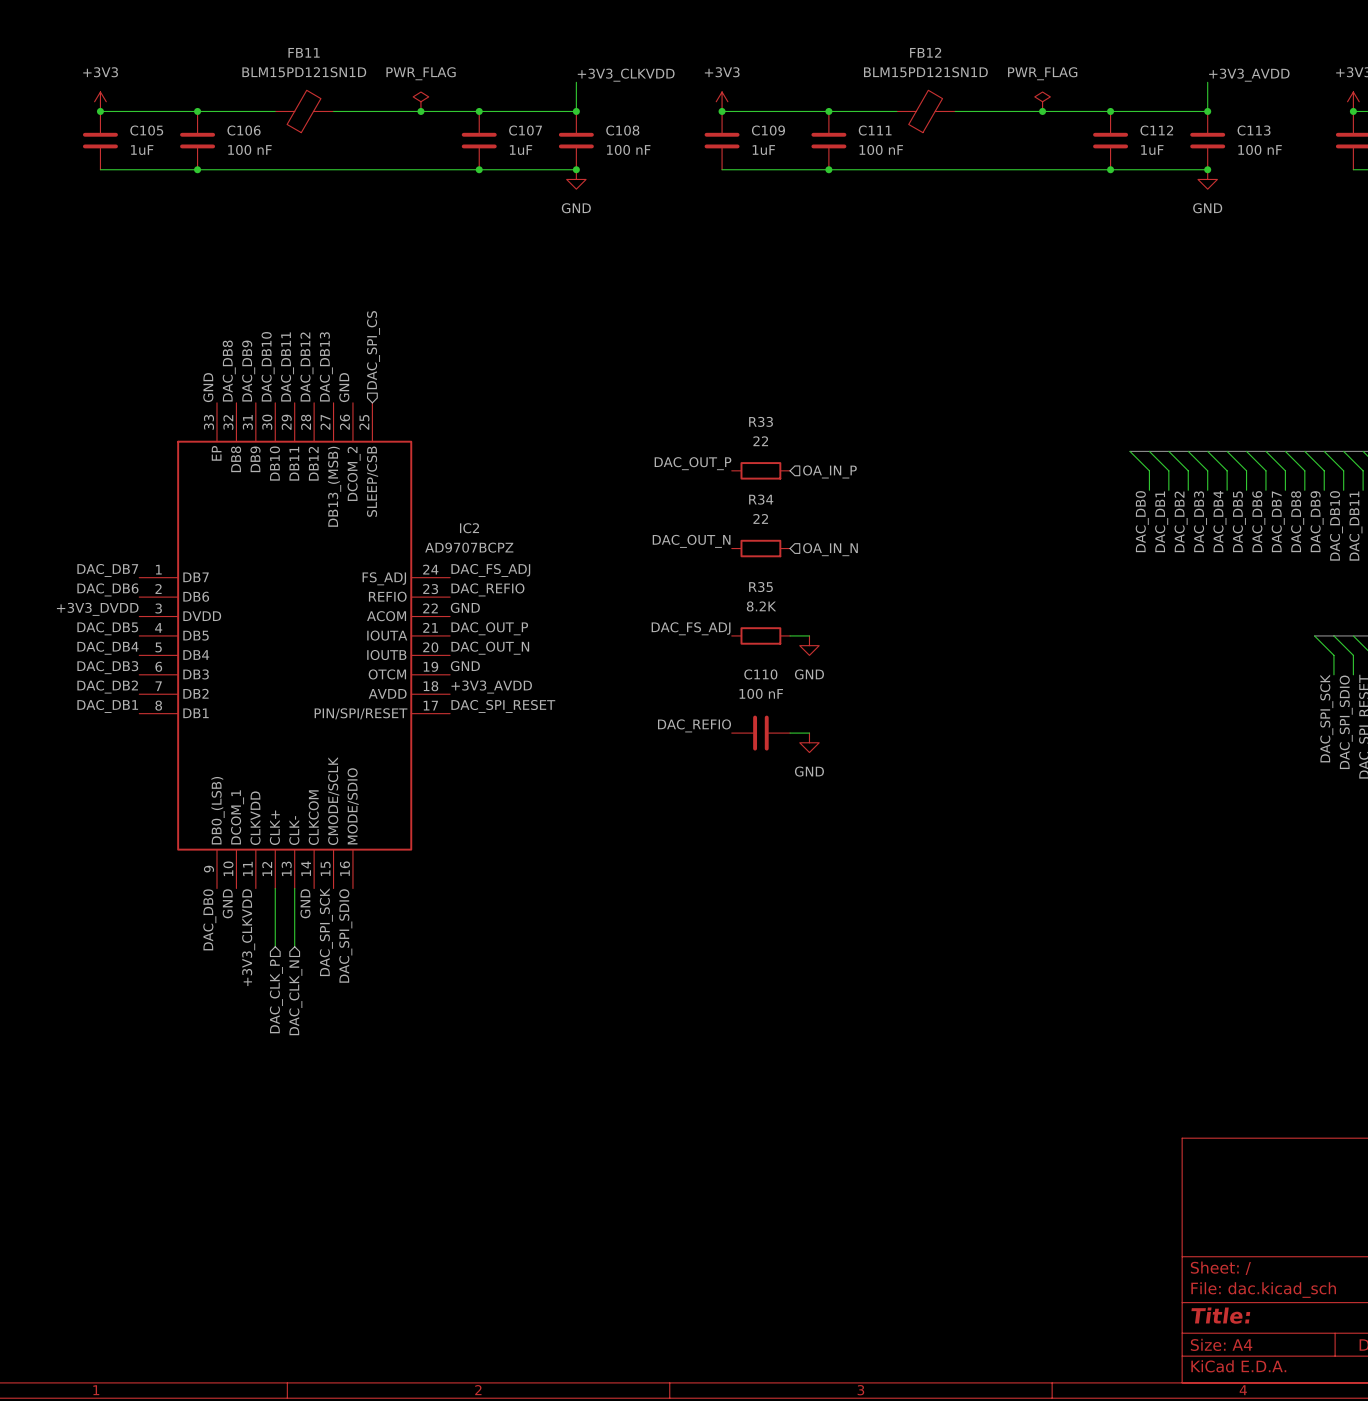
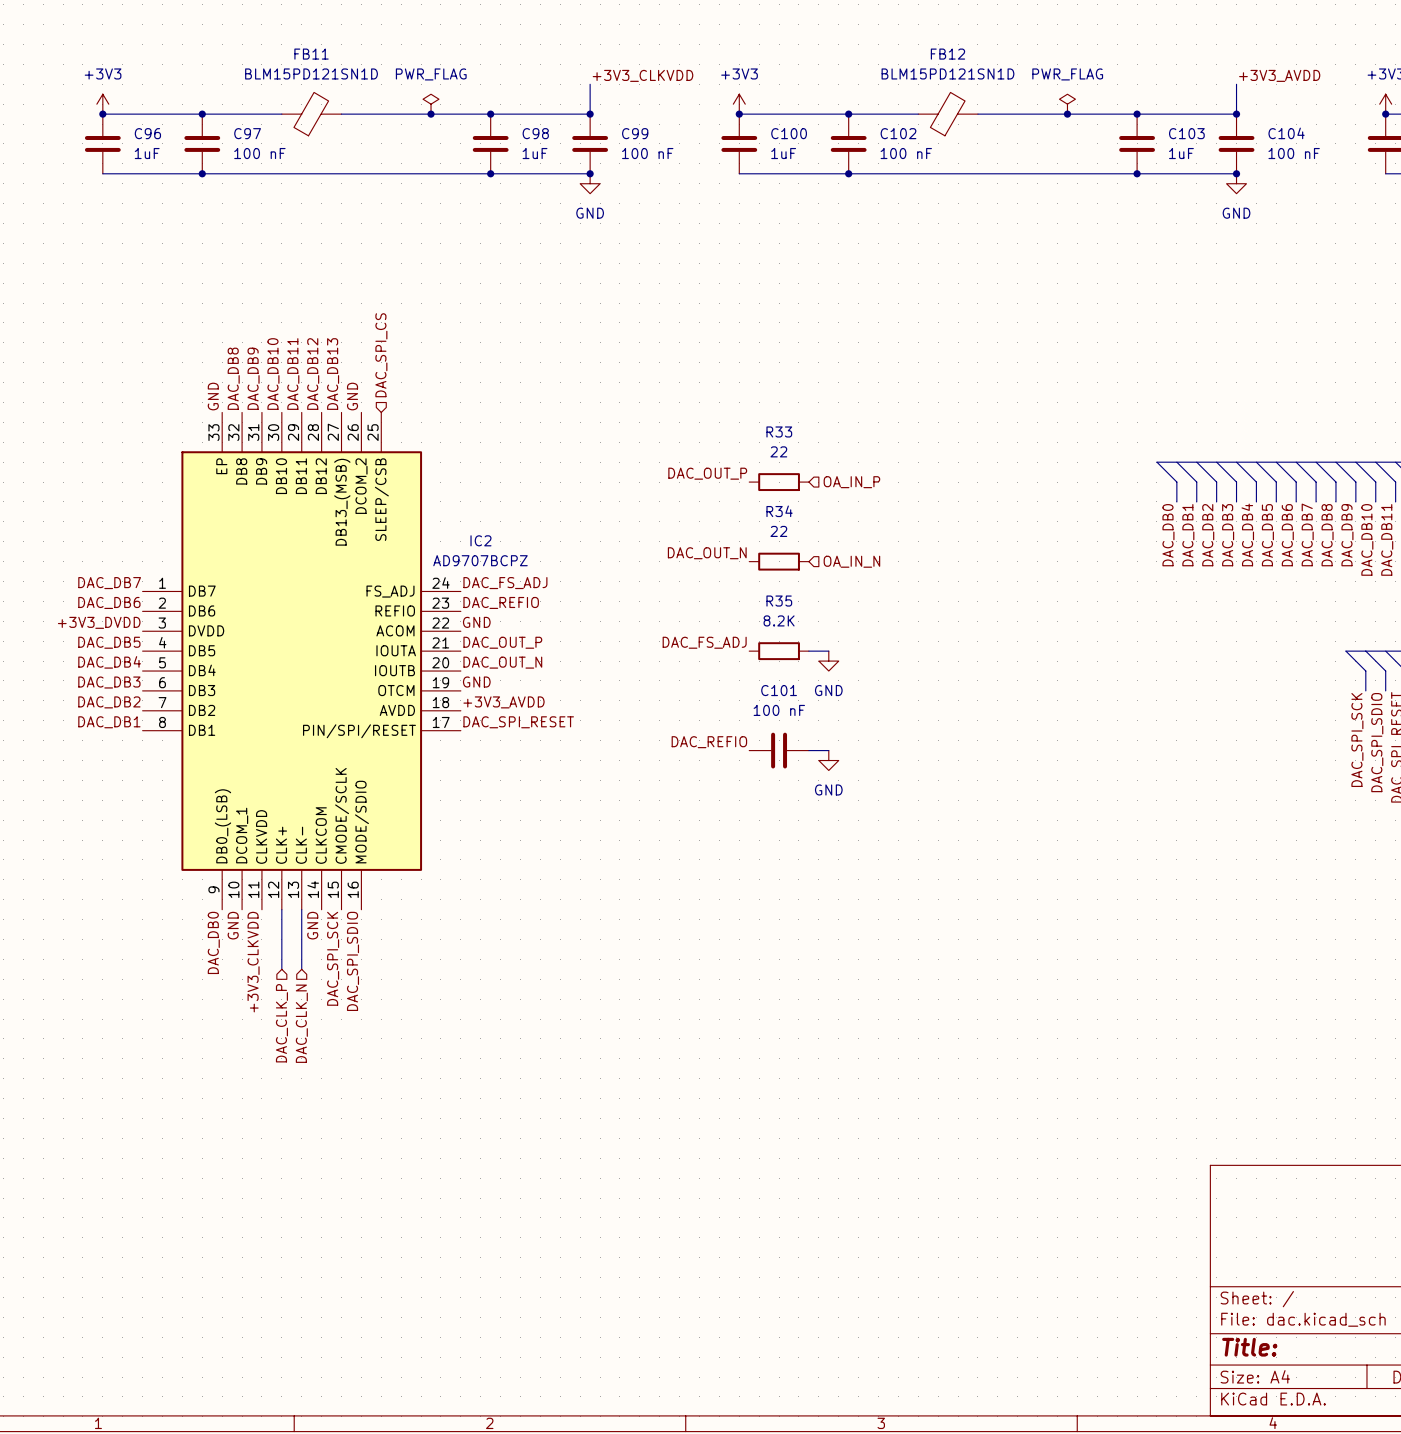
C105 name: C105 (146, 130) -> C96 (147, 133)
C106 name: C106 (244, 130) -> C97 (247, 133)
C107 name: C107 (525, 130) -> C98 (535, 133)
C108 name: C108 (622, 130) -> C99 (635, 133)
C109 name: C109 (768, 130) -> C100 (789, 133)
C111 name: C111 (875, 130) -> C102 (898, 133)
C112 name: C112 (1156, 130) -> C103 (1186, 133)
C113 name: C113 (1254, 130) -> C104 (1286, 133)
C110 name: C110 (760, 674) -> C101 (779, 690)

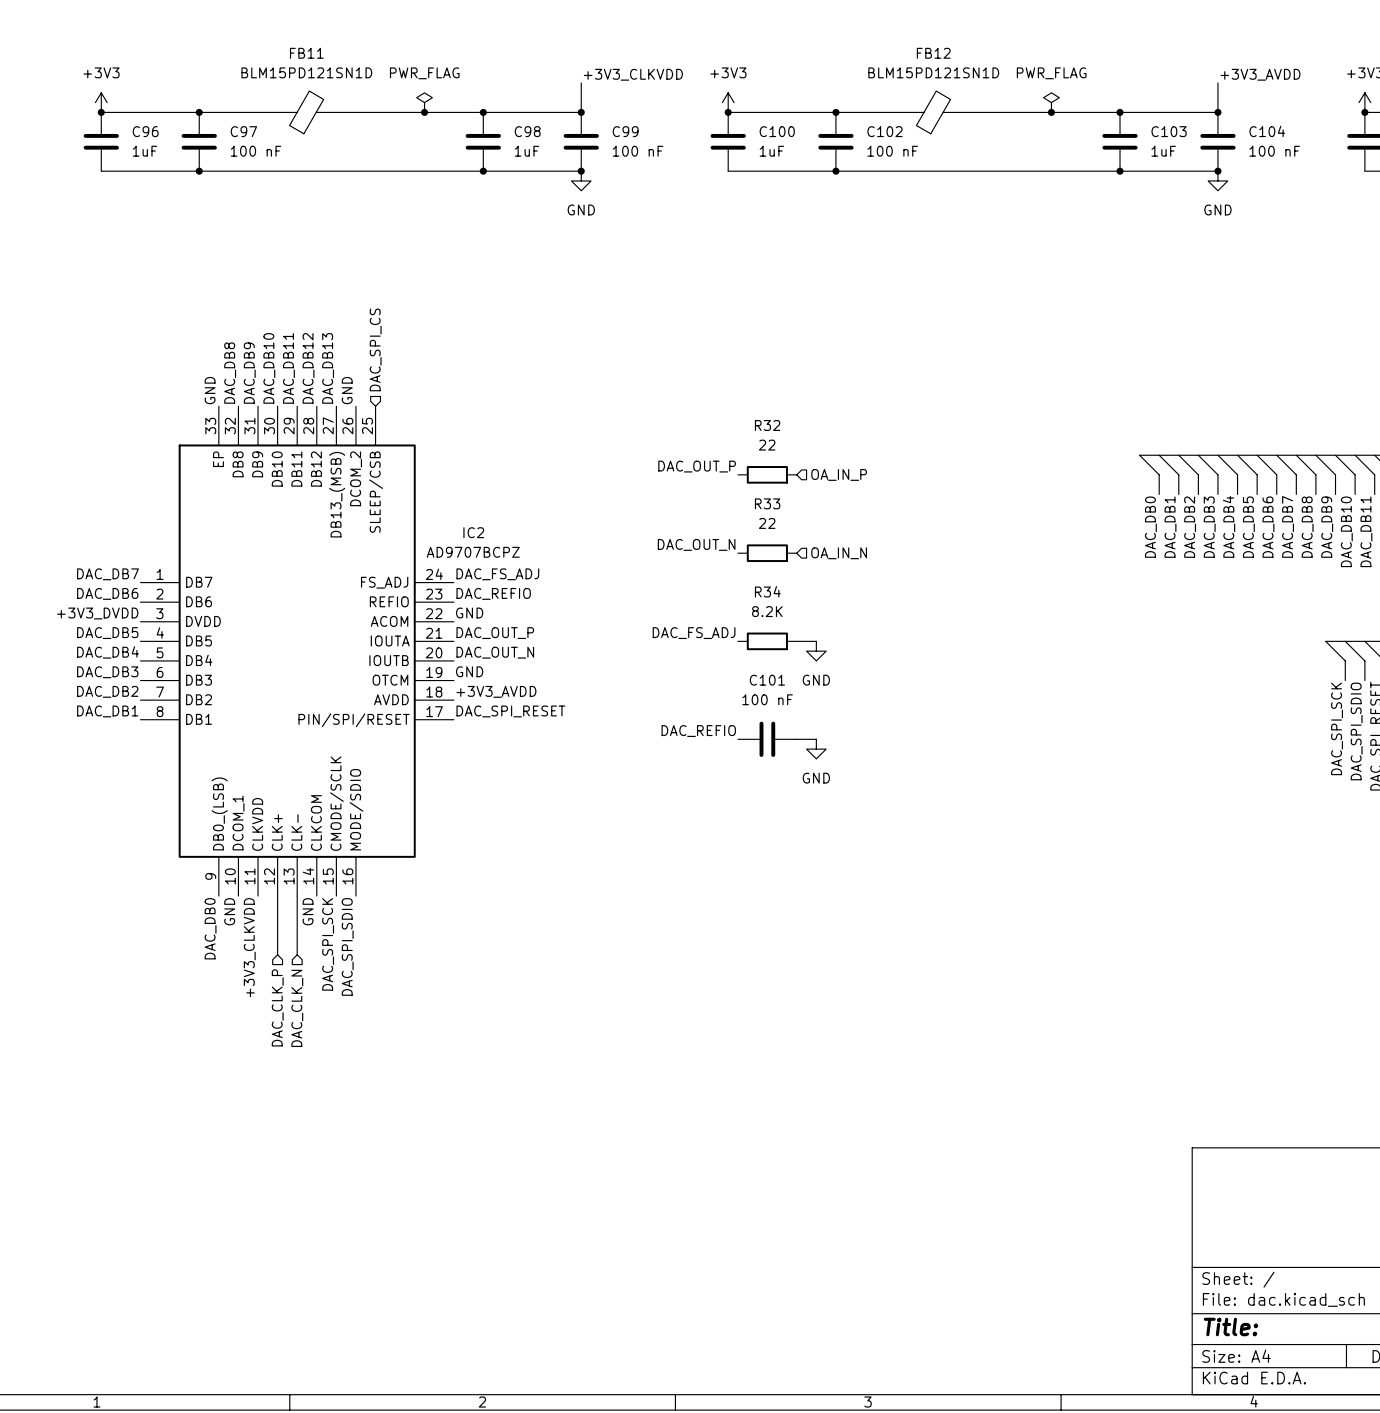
R33 name: R33 (779, 431) -> R32 (767, 425)
R34 name: R34 (779, 511) -> R33 (767, 503)
R35 name: R35 (779, 601) -> R34 (767, 591)

